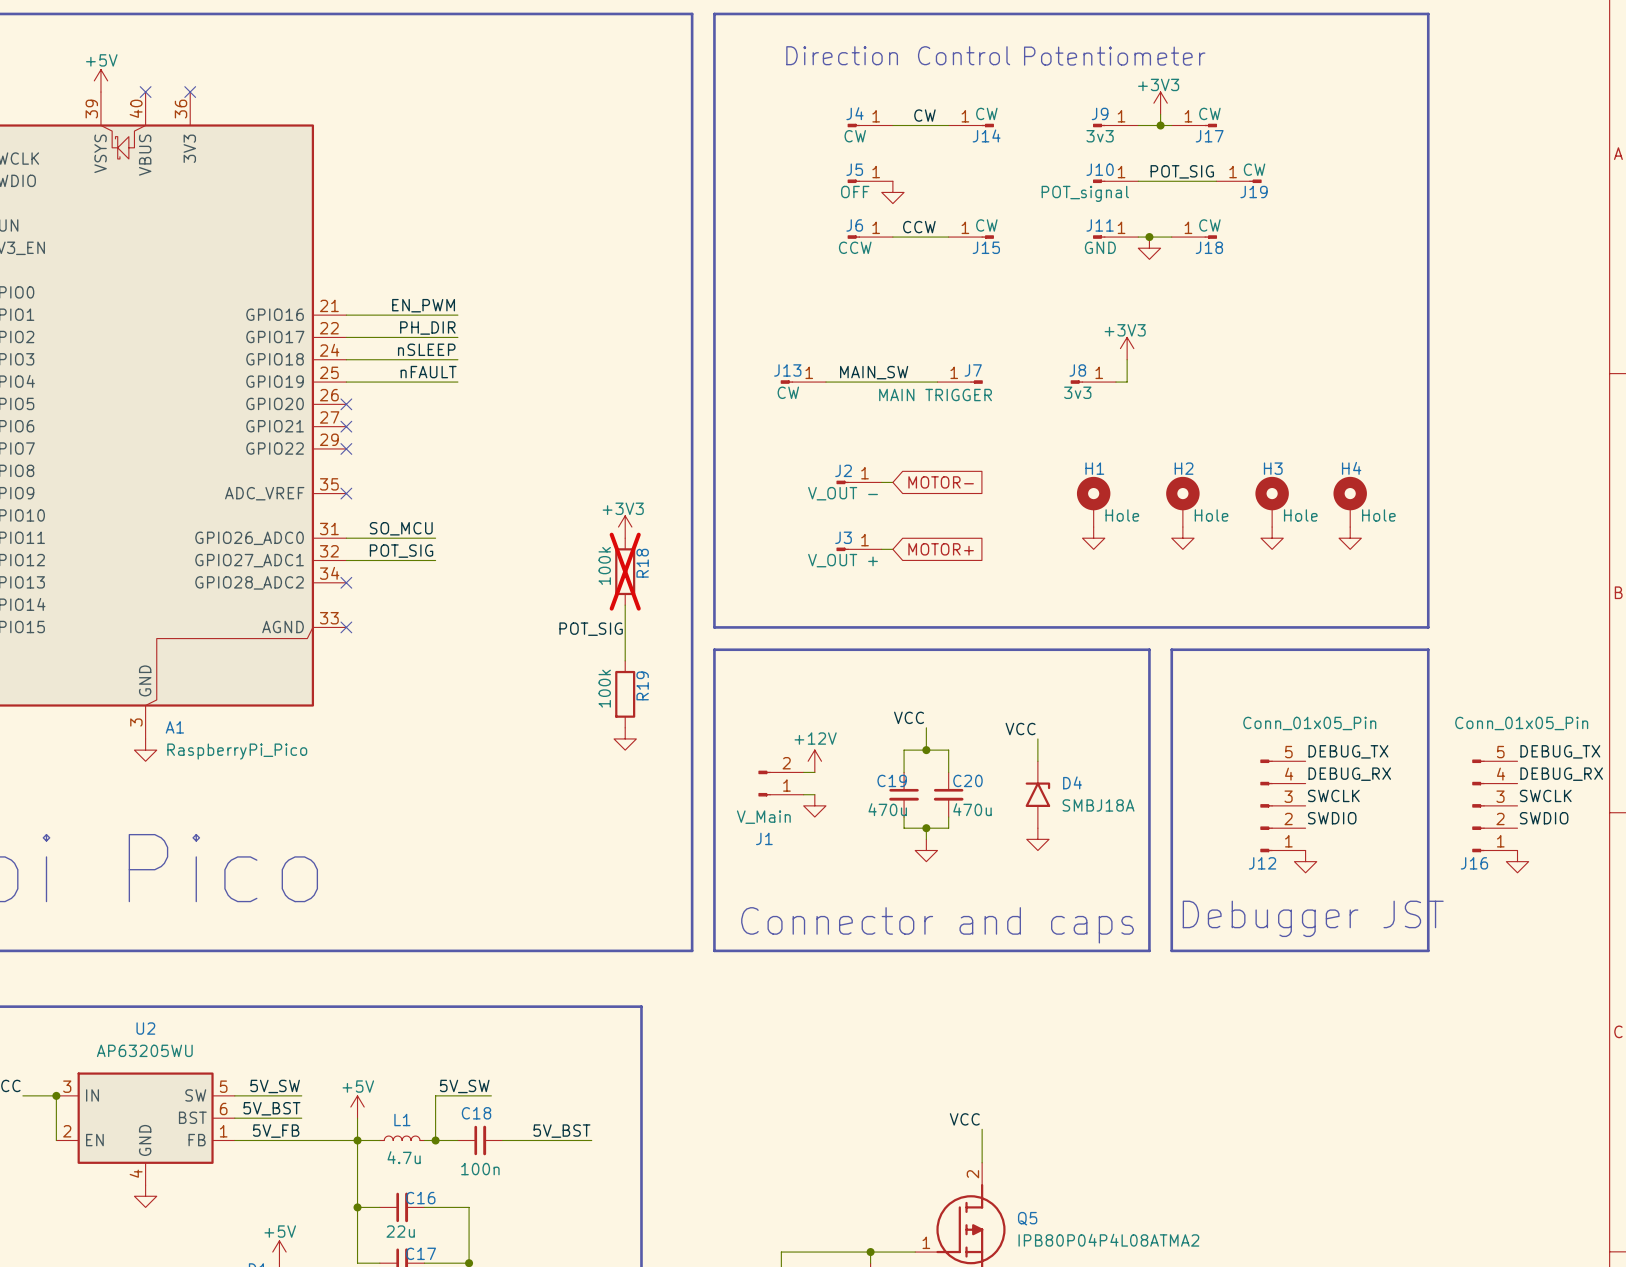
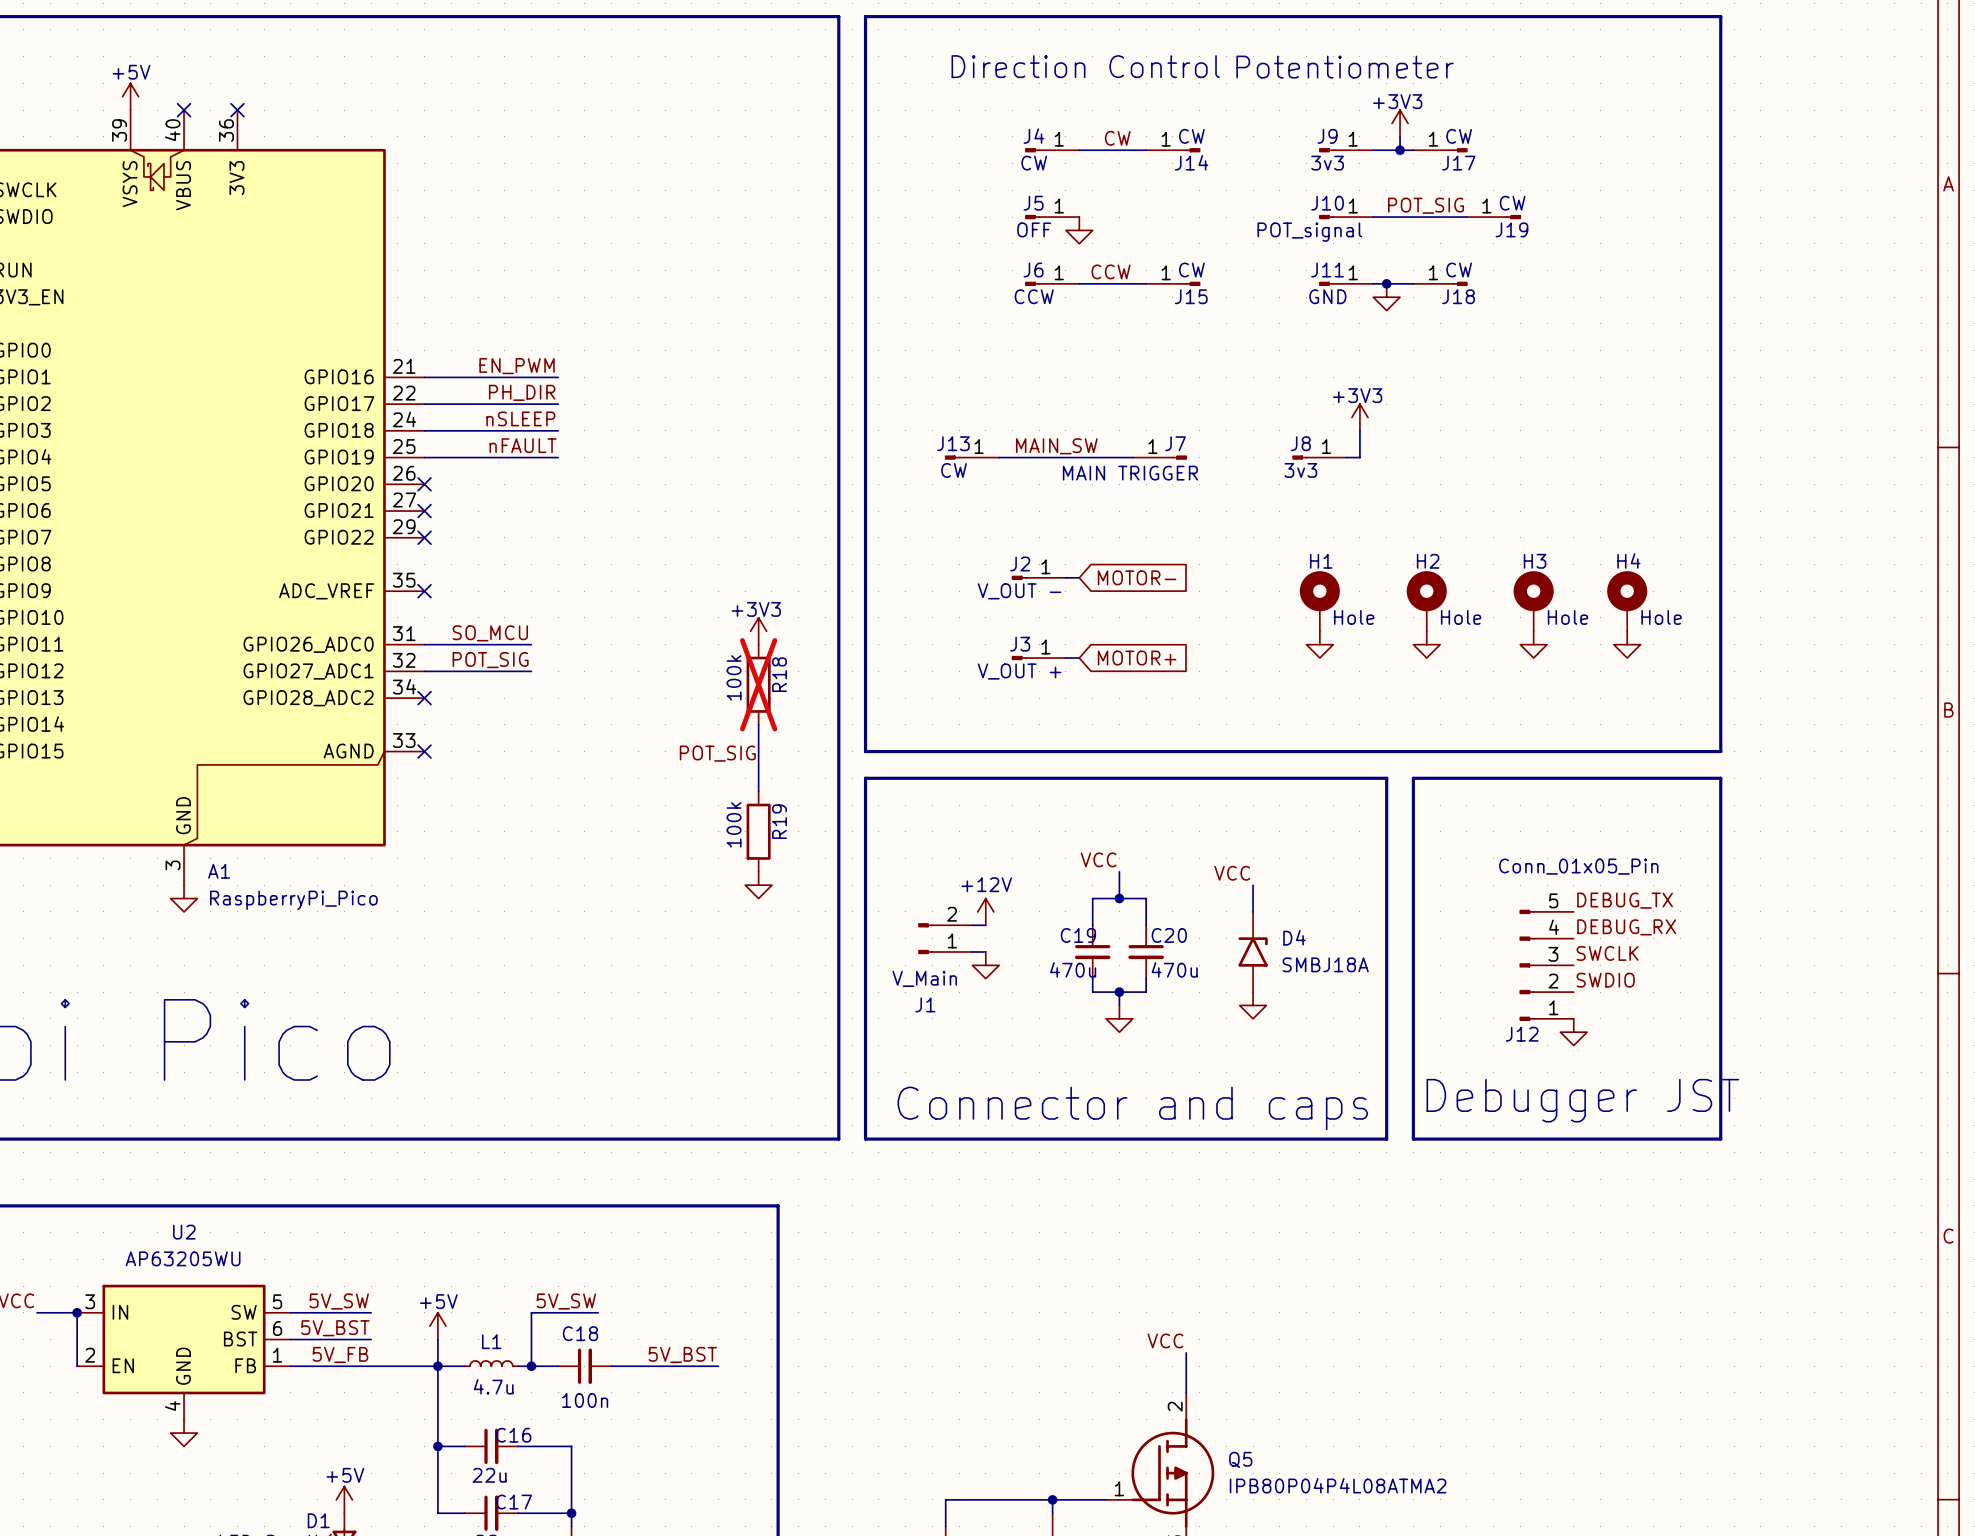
label: DEBUG_TX (1560, 751) -> none
label: DEBUG_RX (1561, 774) -> none
label: SWCLK (1545, 795) -> none
J16: Conn_01x05_Pin (1494, 805) -> none
label: SWDIO (1544, 818) -> none
power symbol: (1517, 861) -> none

